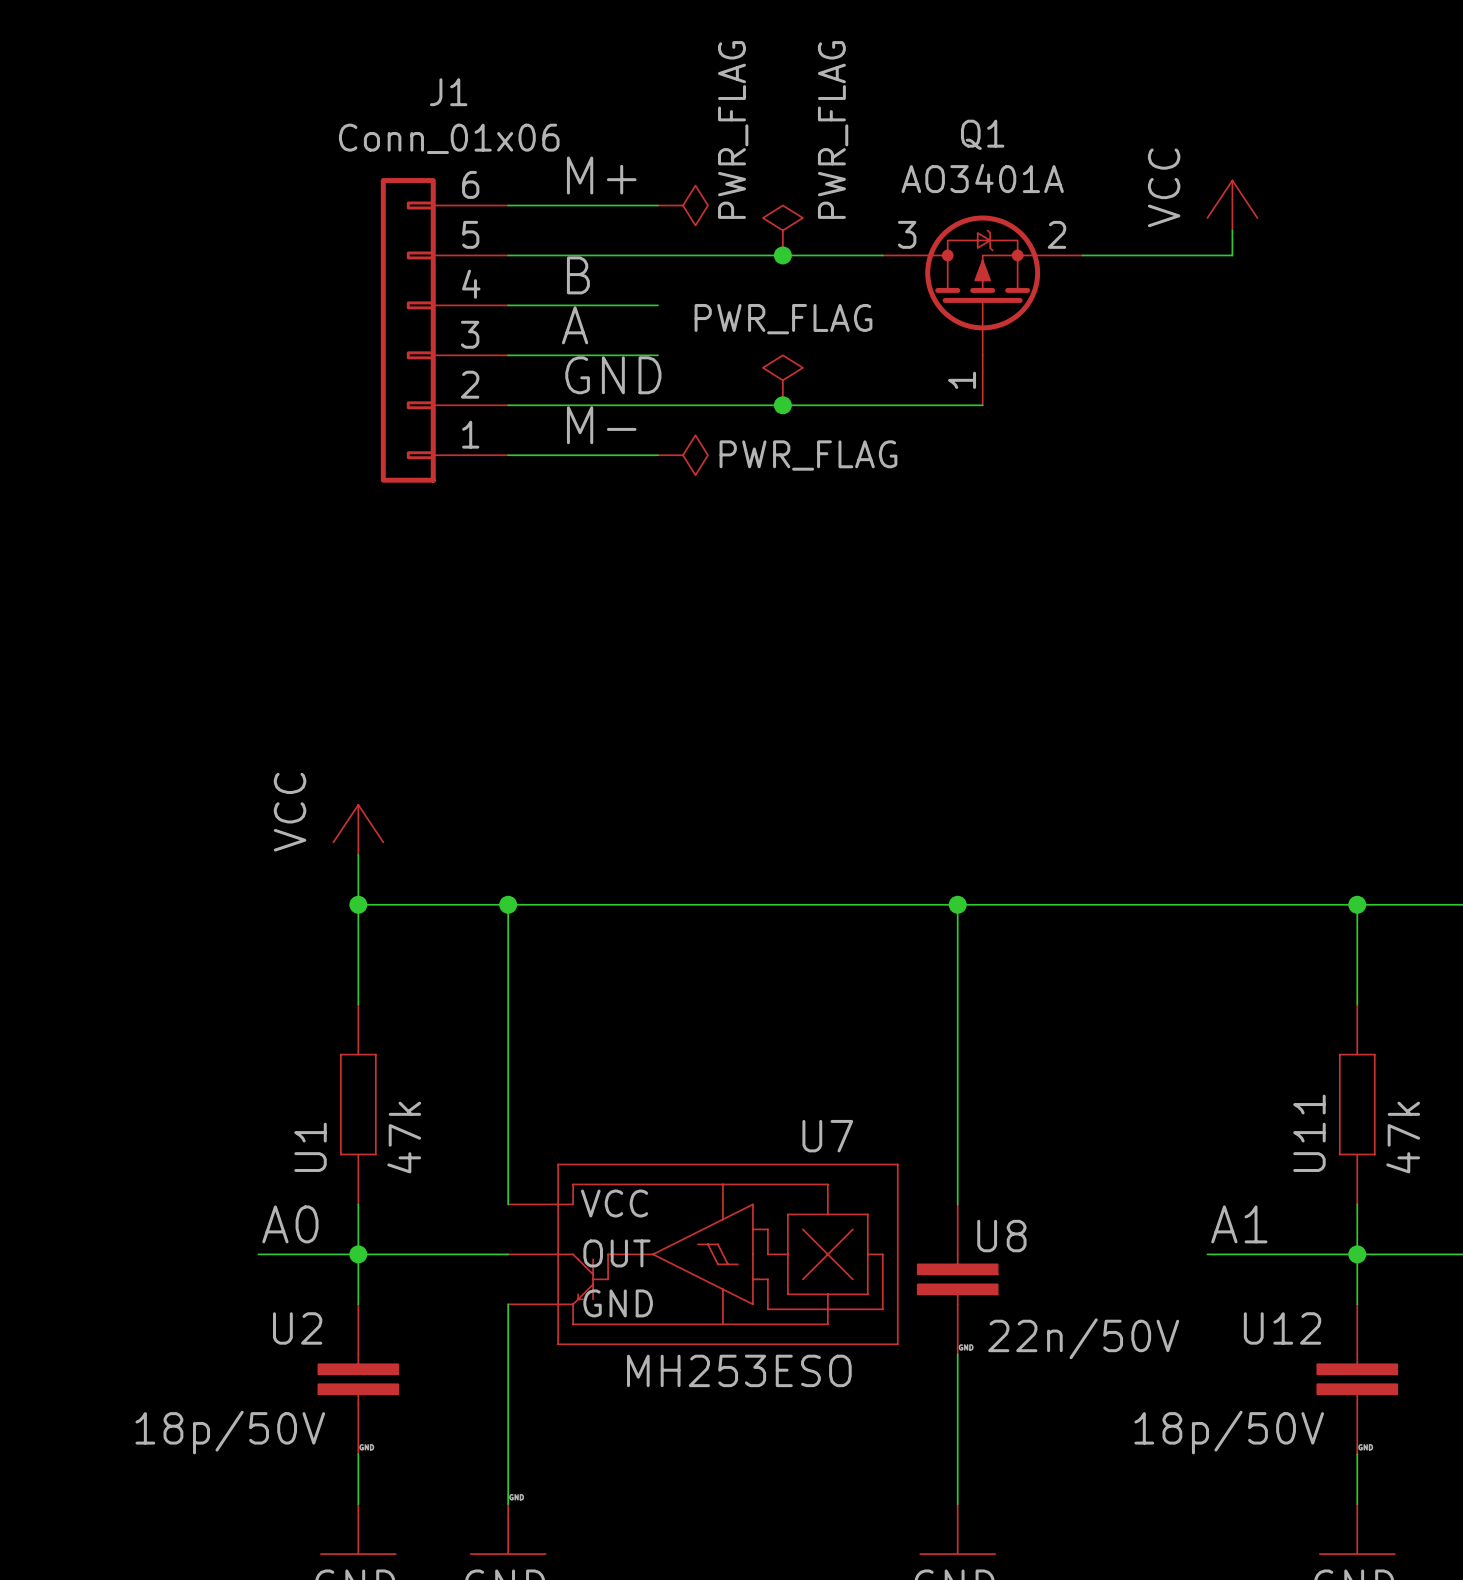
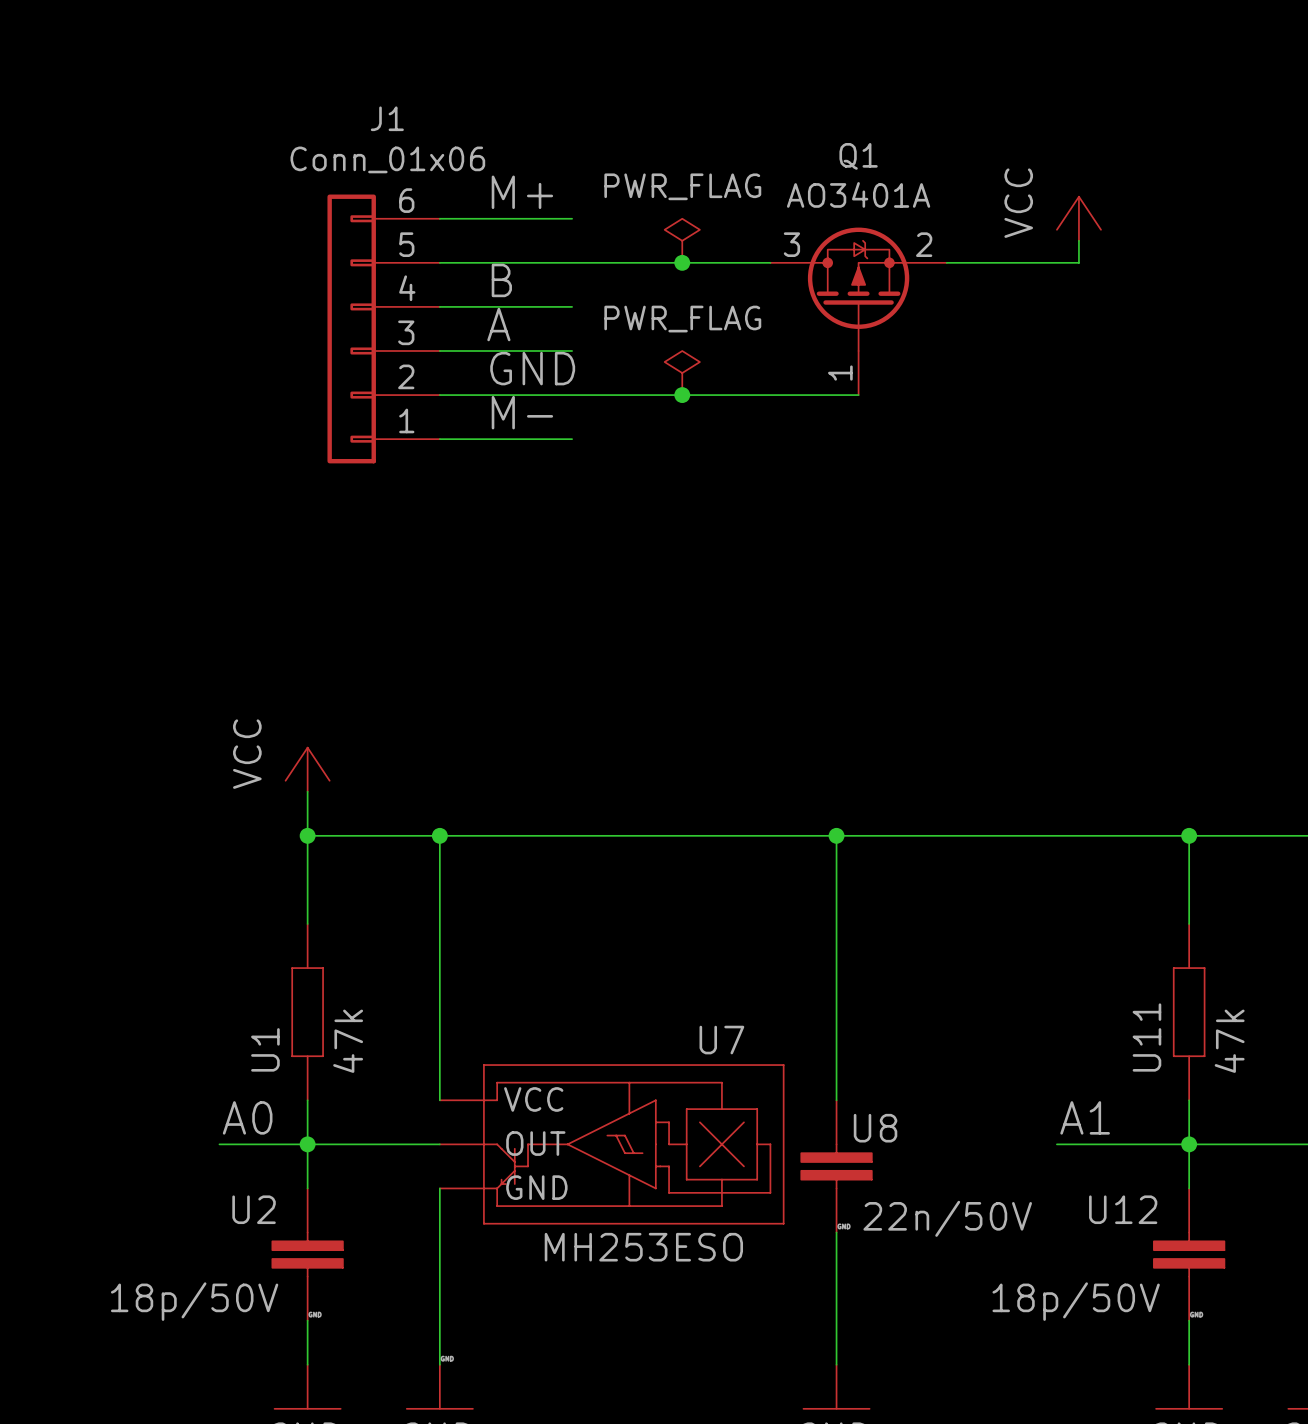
power symbol text rotation: 0° (833, 129) -> 90° clockwise (682, 186)
power symbol: PWR_FLAG (682, 205) -> none
power symbol: PWR_FLAG (682, 455) -> none

